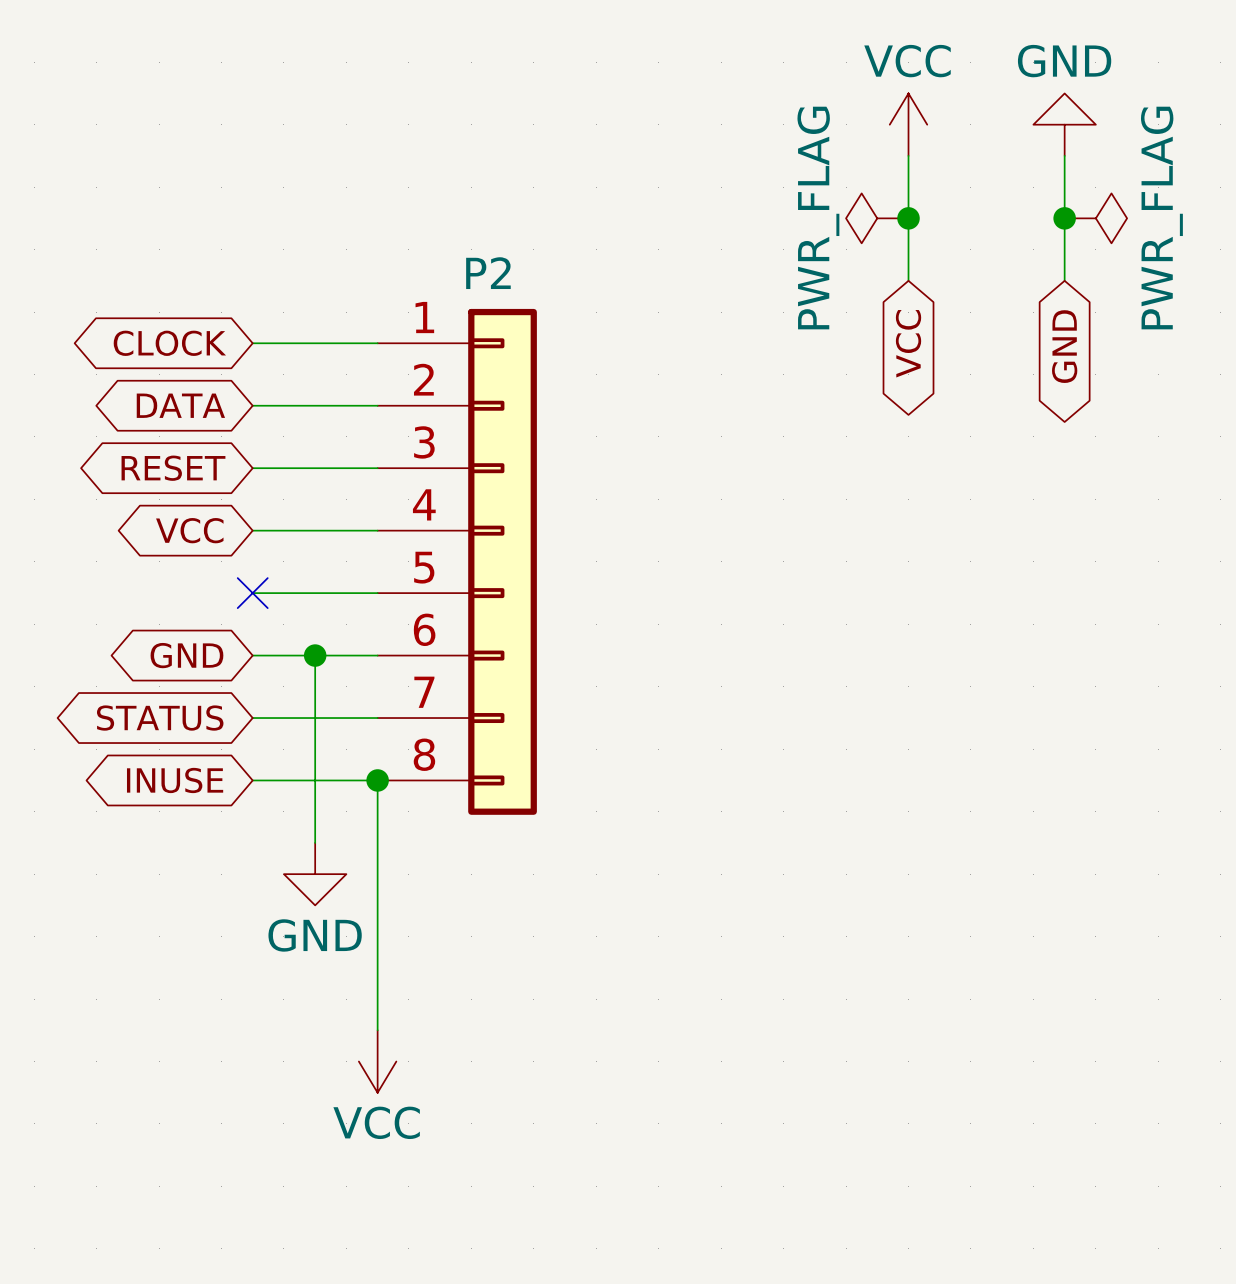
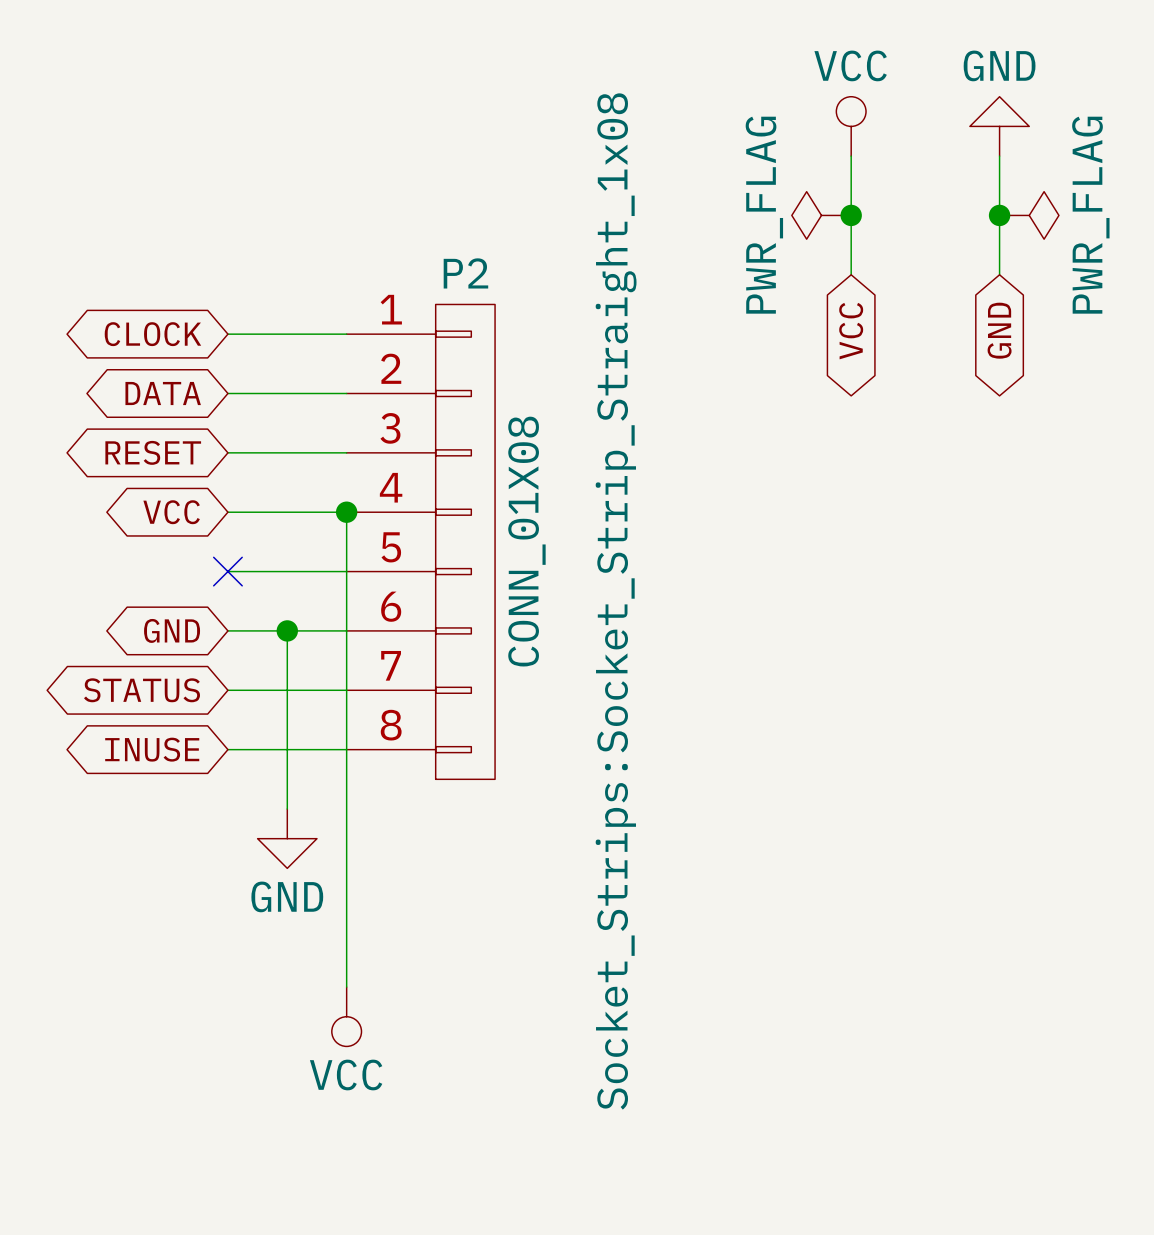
power symbol shape: [889, 93, 928, 156] -> [836, 96, 867, 157]
P2 symbol: [377, 308, 537, 815] -> [346, 304, 496, 780]
wire: none -> (346, 512) (346, 749)
junction: none -> (346, 512)
P2 value: none -> CONN_01X08 (526, 541)
P2 text: none -> Socket_Strips:Socket_Strip_Straight_1x08 (616, 601)
junction: (377, 780) -> none
power symbol shape: [358, 1030, 397, 1093] -> [331, 987, 362, 1047]

